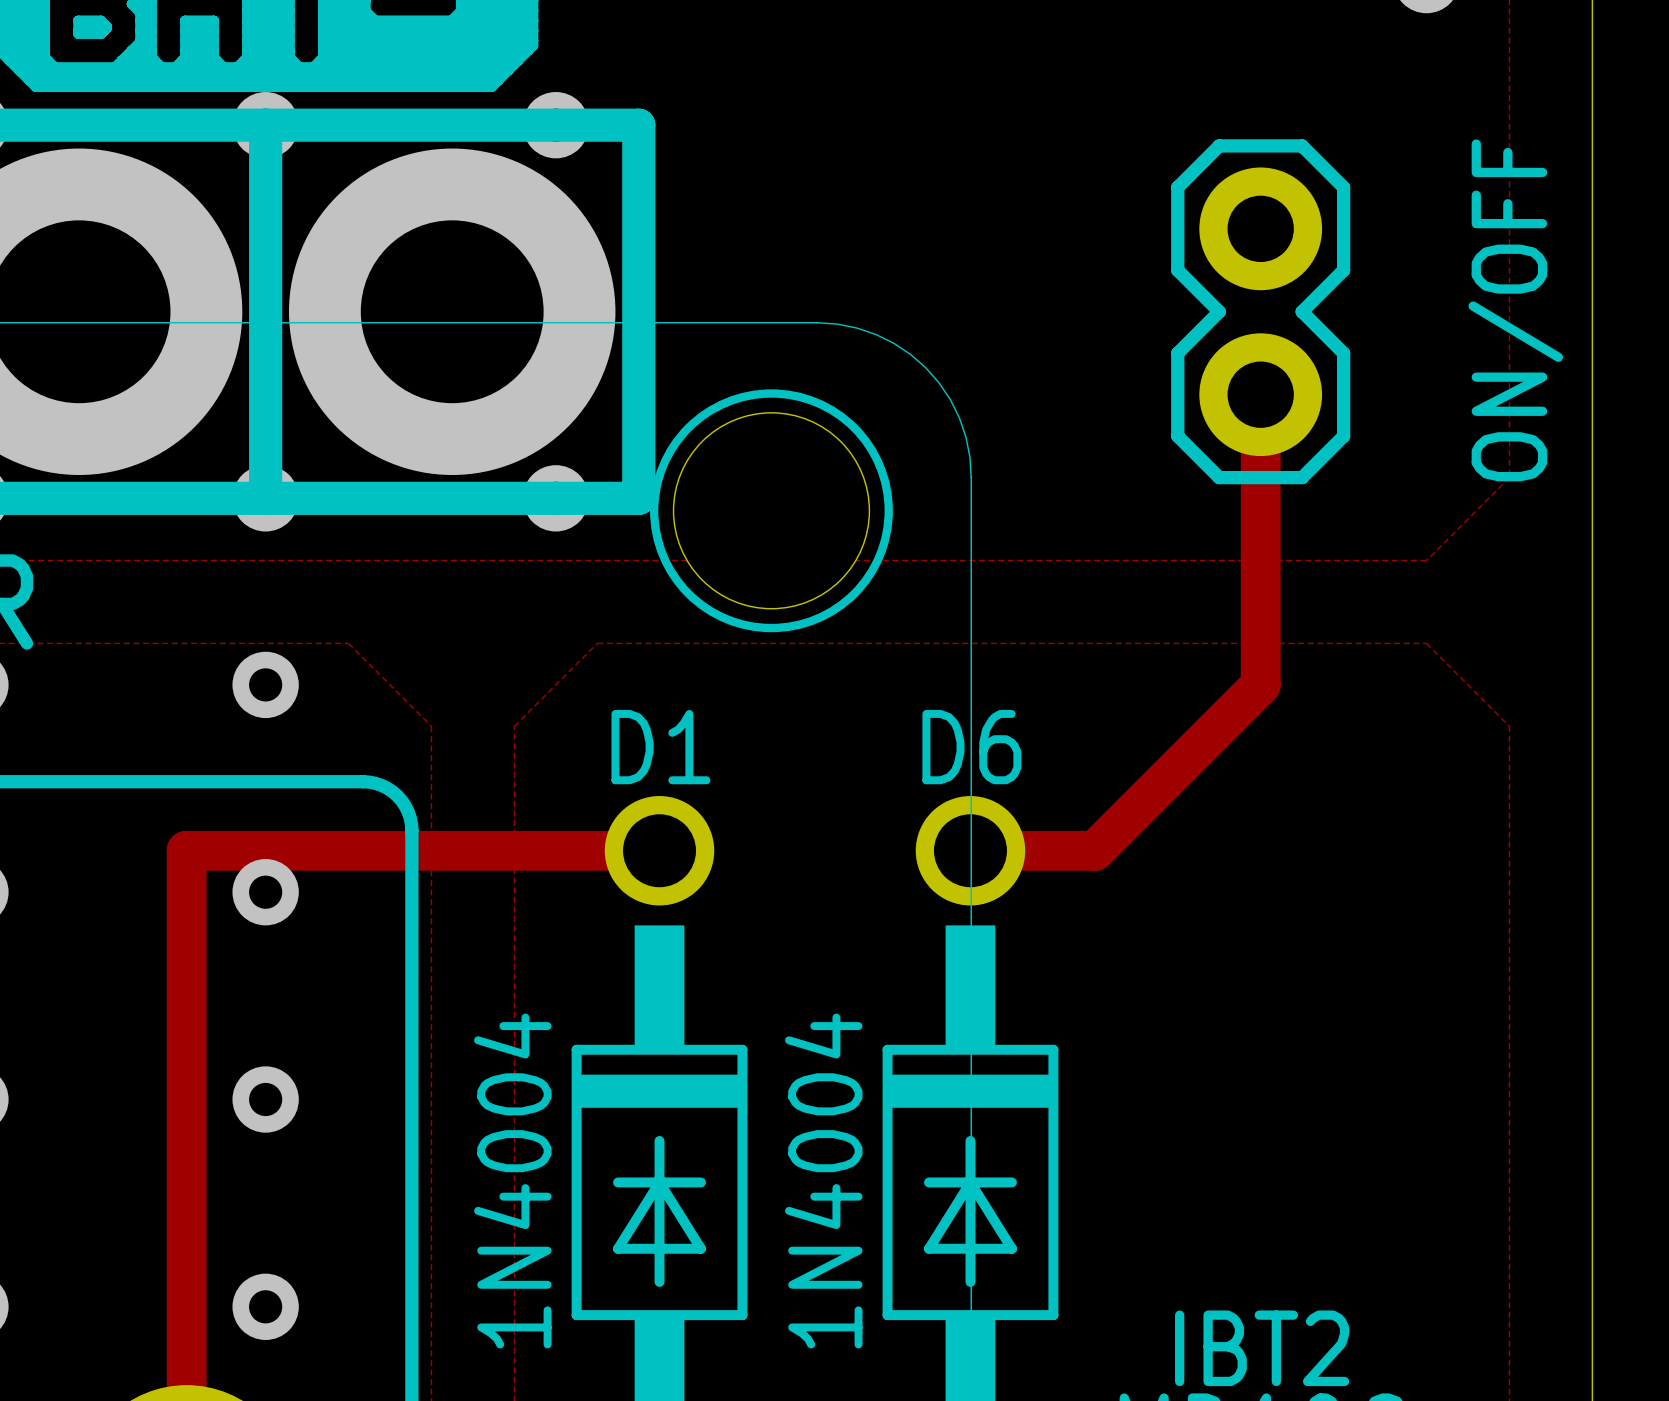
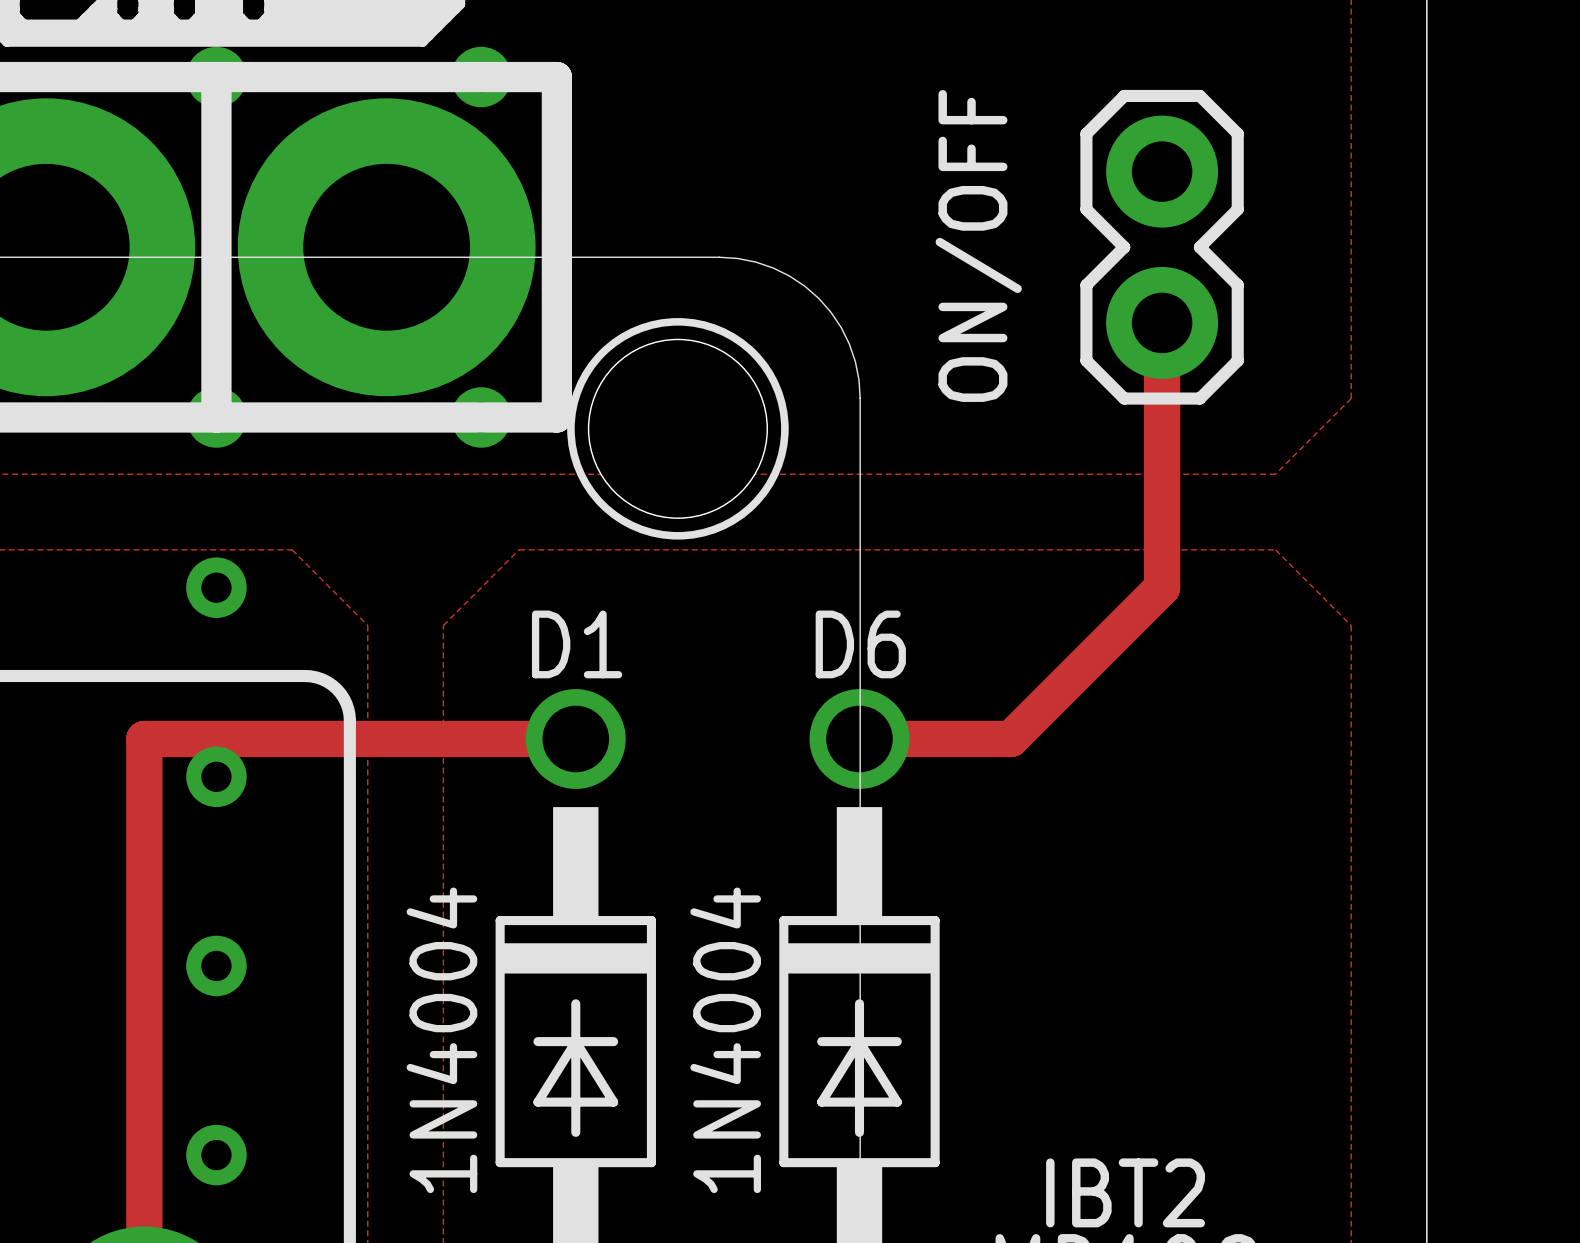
ON/OFF name position: ON/OFF (1515, 310) -> ON/OFF (978, 245)
ON/OFF position: (1260, 311) -> (1162, 247)
track: (1260, 394) (1260, 684) (1094, 850) -> (1162, 322) (1162, 587) (1010, 738) (972, 738)

